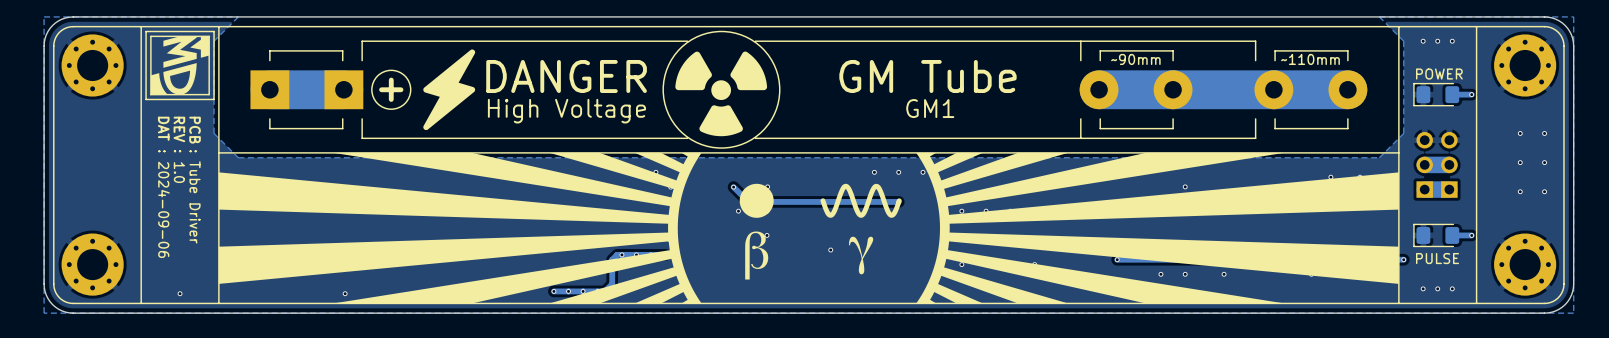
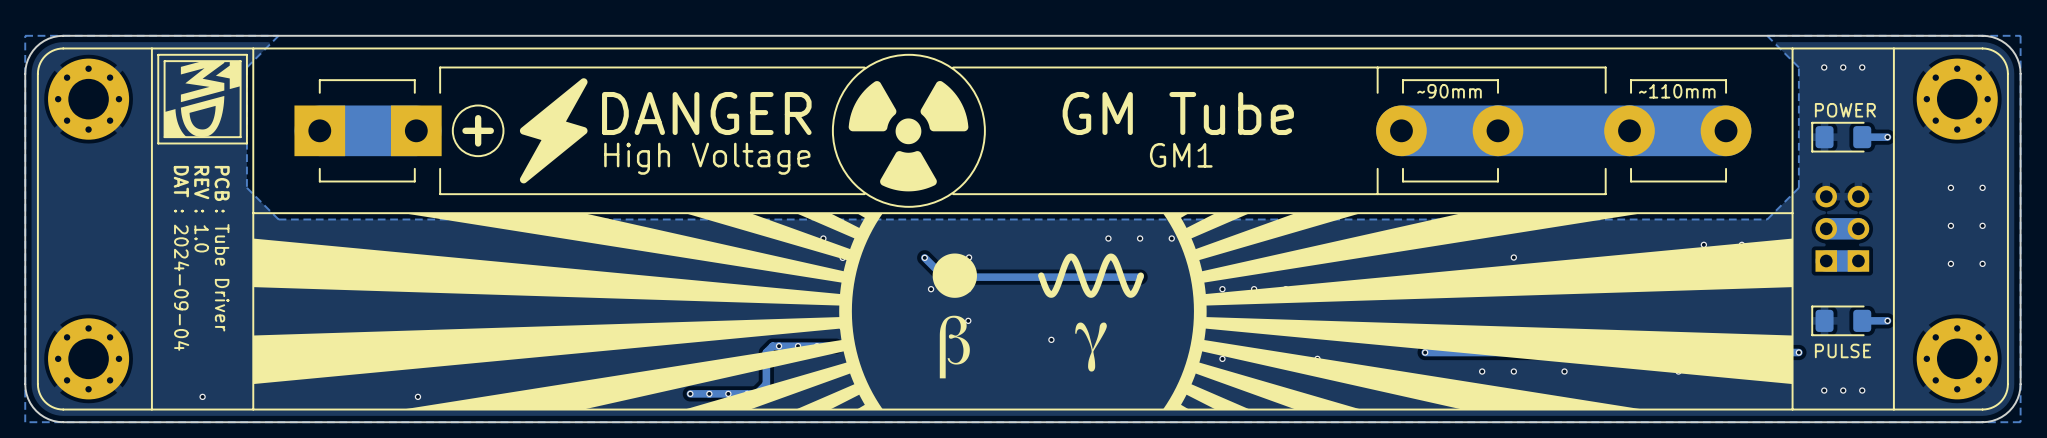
text: : 2024-09-06 (163, 204) -> : 2024-09-04 (181, 280)

